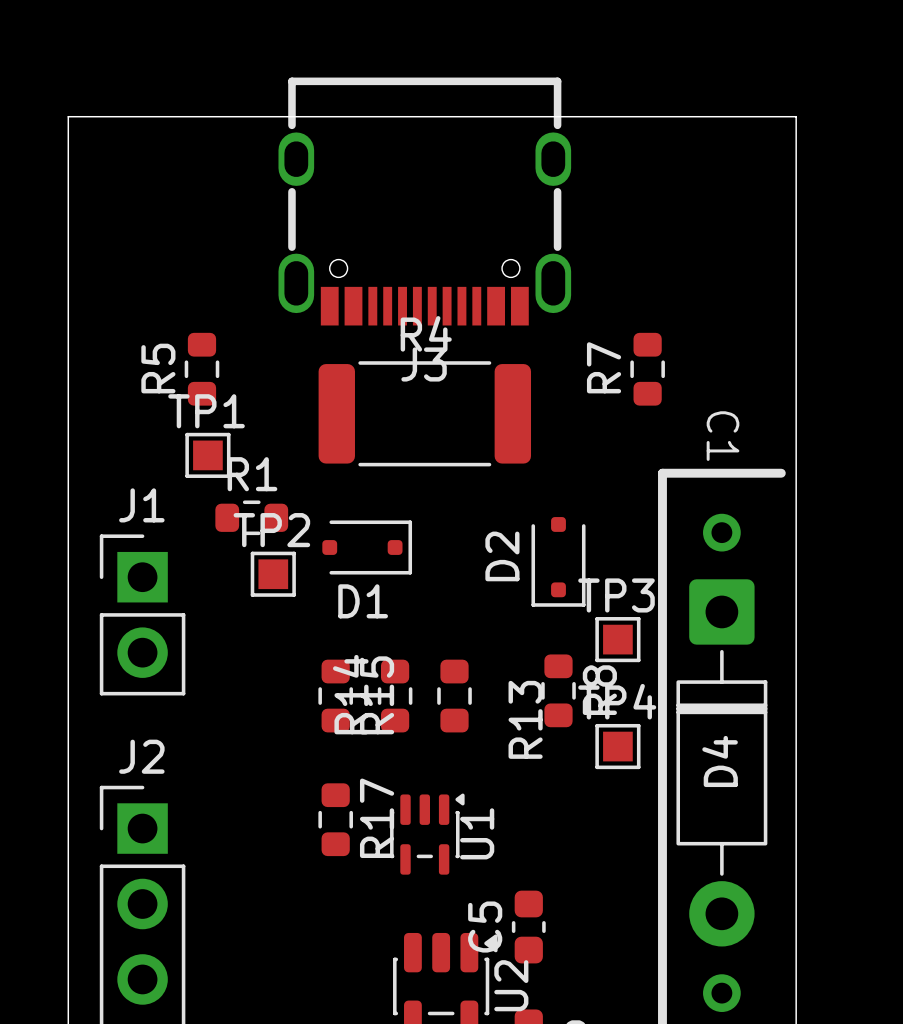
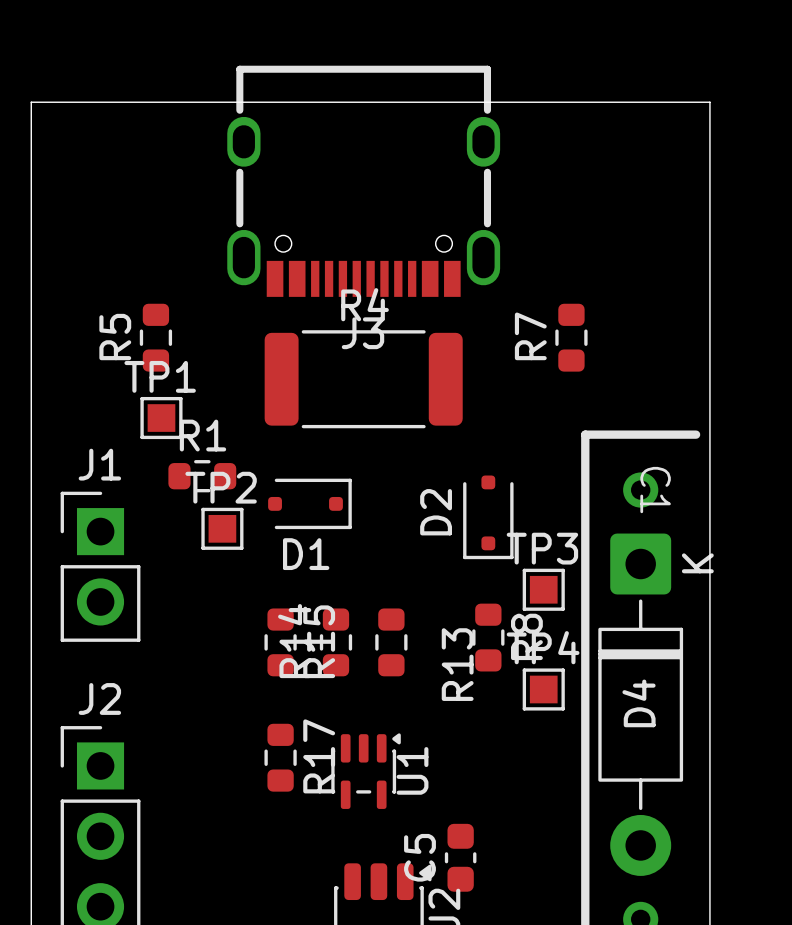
C1 name position: C1 (723, 436) -> C1 (655, 490)
D4 text: none -> K (697, 563)

